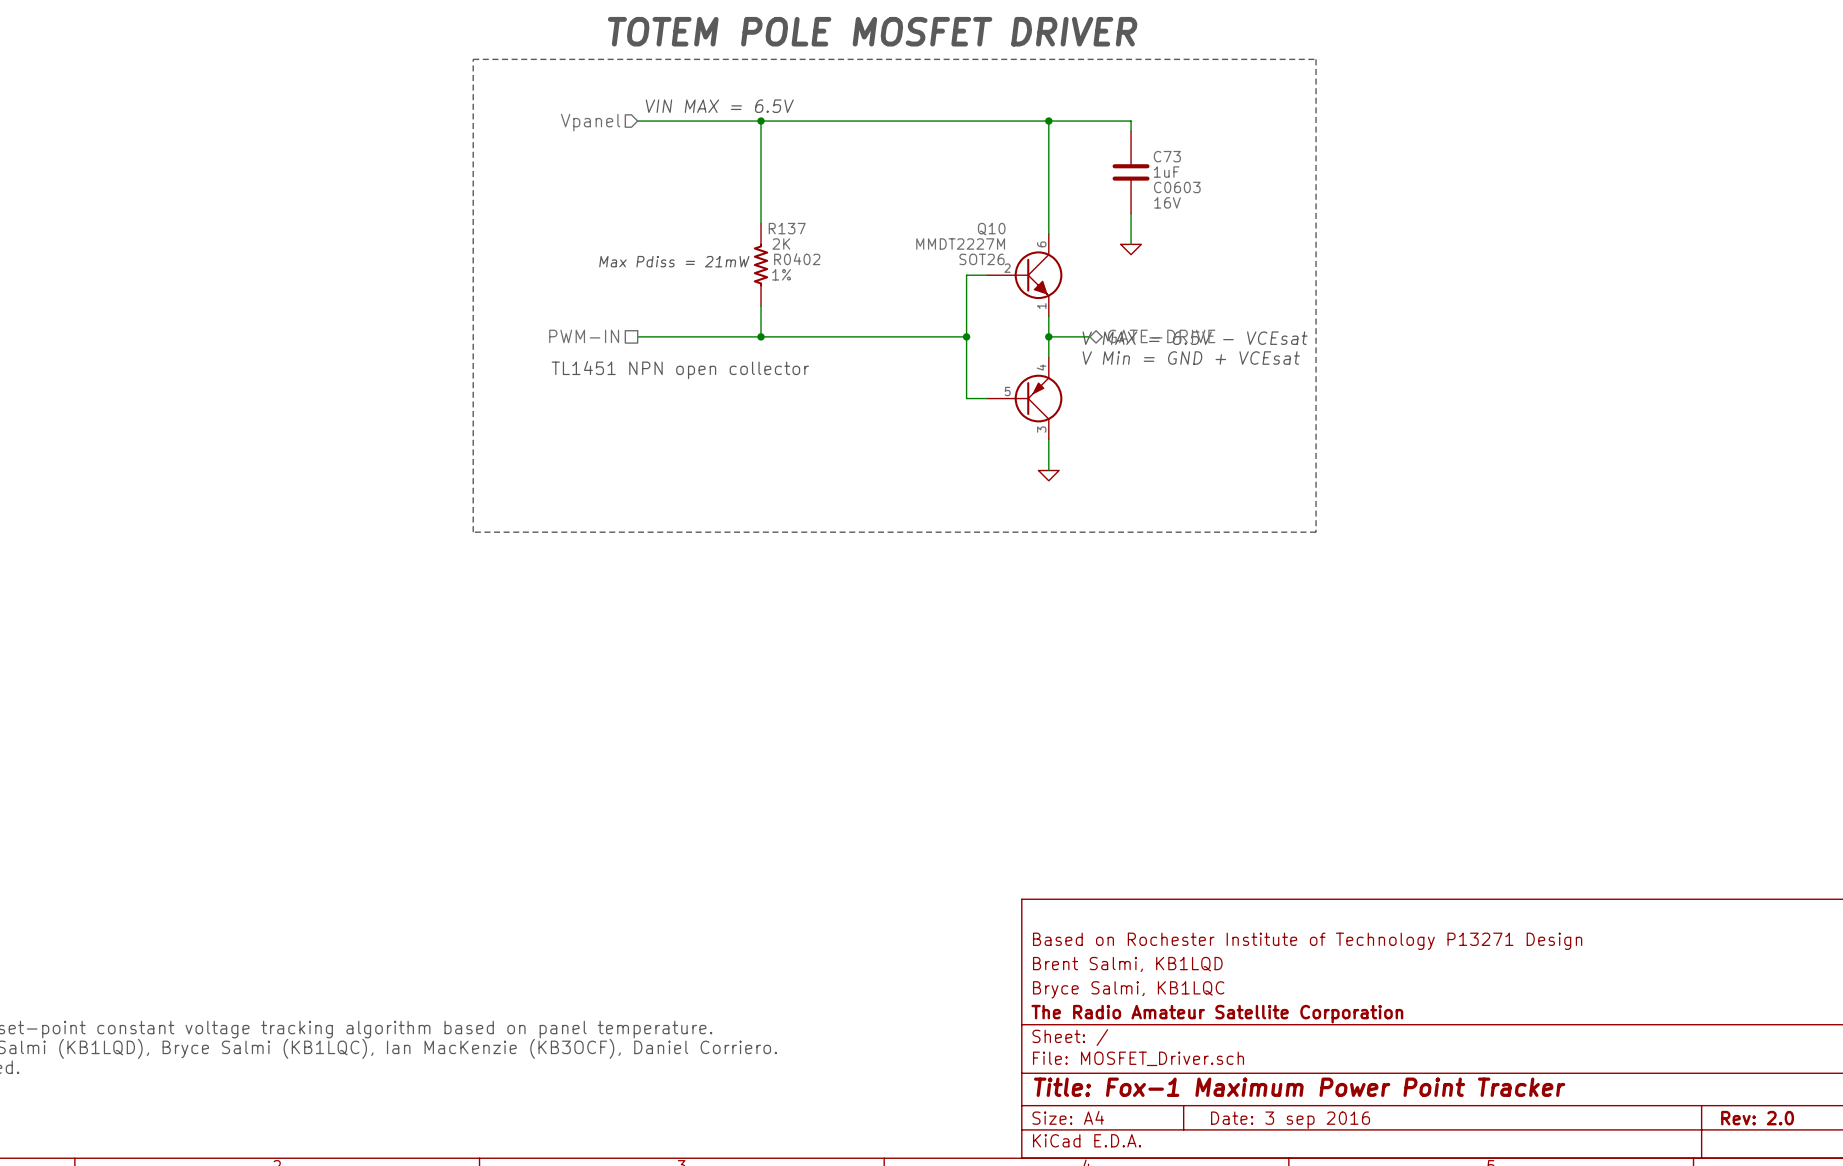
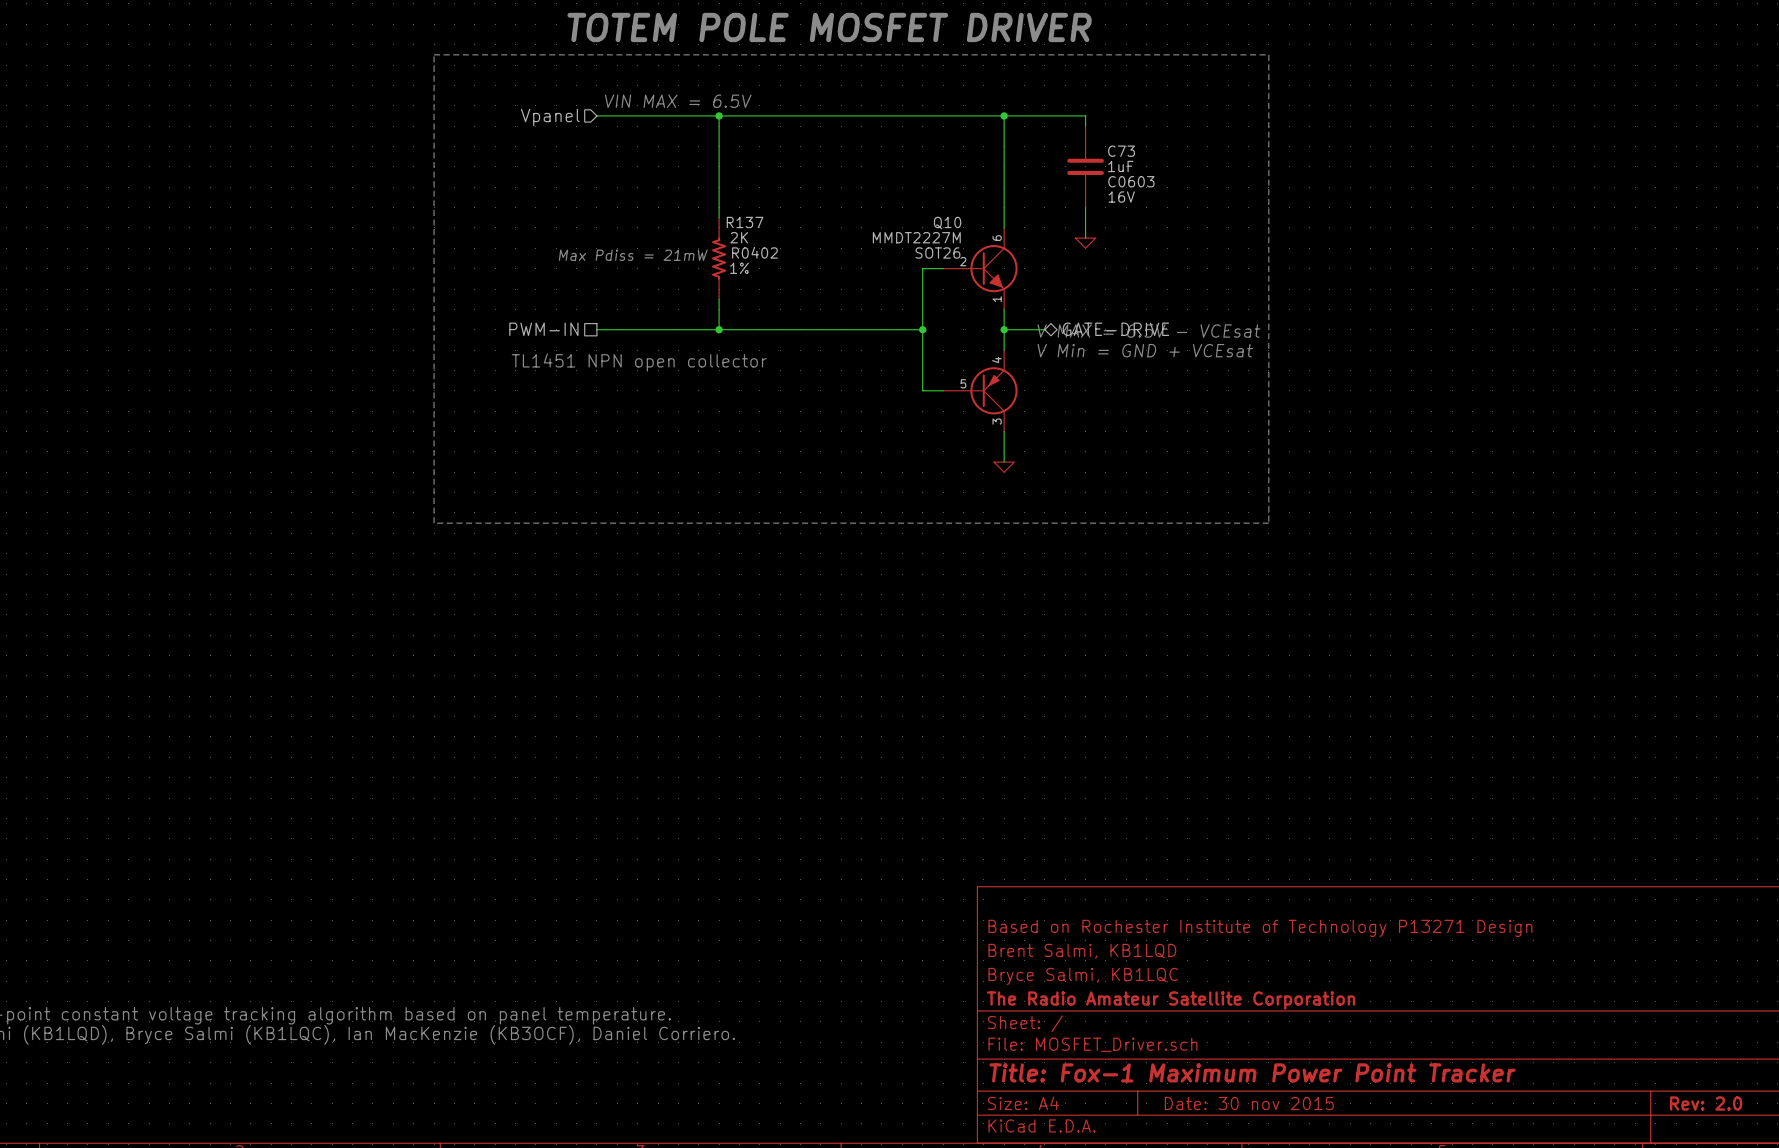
title block: Date: 3 sep 2016 (1290, 1120) -> Date: 30 nov 2015 (1249, 1103)

